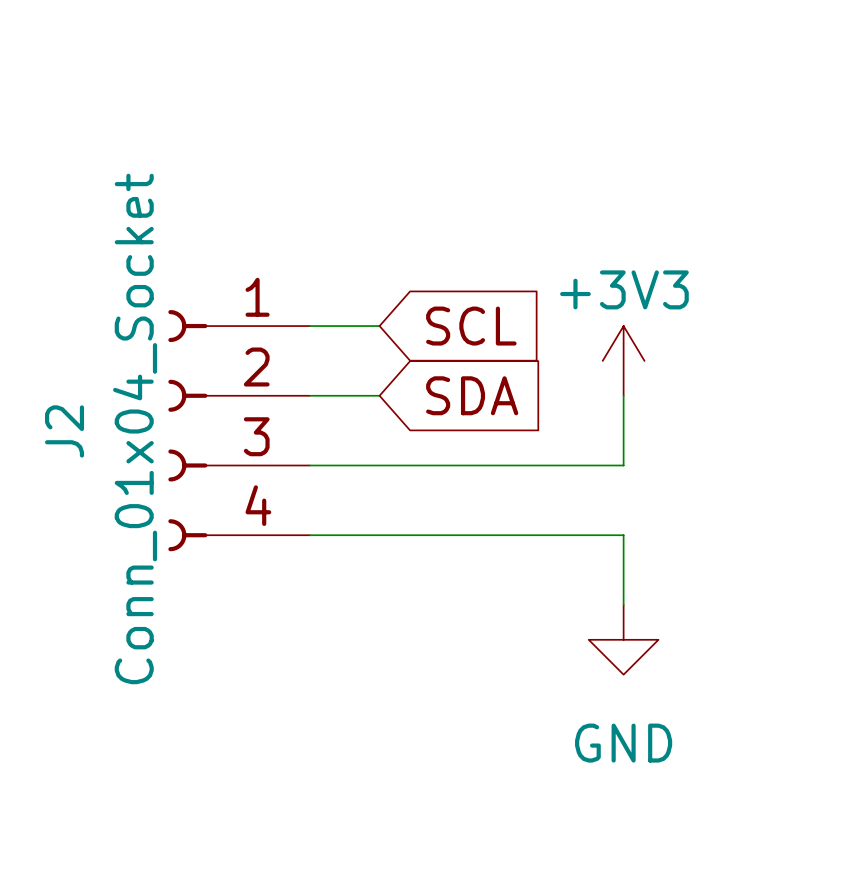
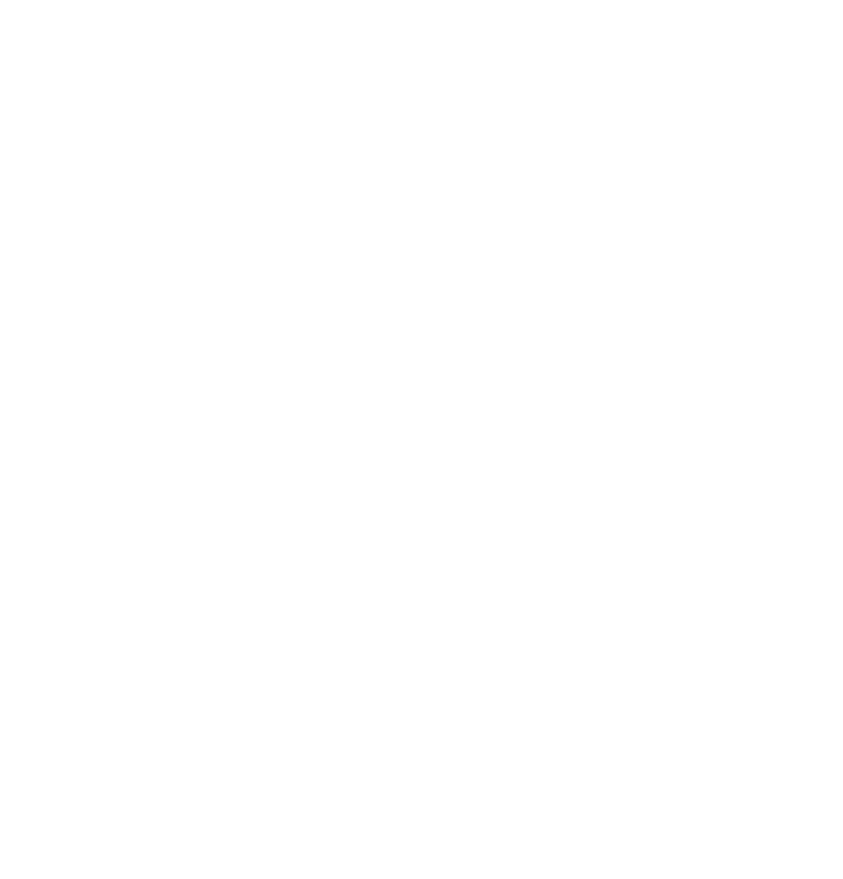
wire: (309, 326) (379, 326) -> none
global label: SCL (471, 326) -> none
power symbol: +3V3 (623, 360) -> none
wire: (309, 395) (379, 395) -> none
global label: SDA (472, 395) -> none
wire: (623, 395) (623, 465) (309, 465) -> none
J2: Conn_01x04_Socket (239, 430) -> none
wire: (309, 535) (623, 535) (623, 604) -> none
power symbol: GND (623, 639) -> none

